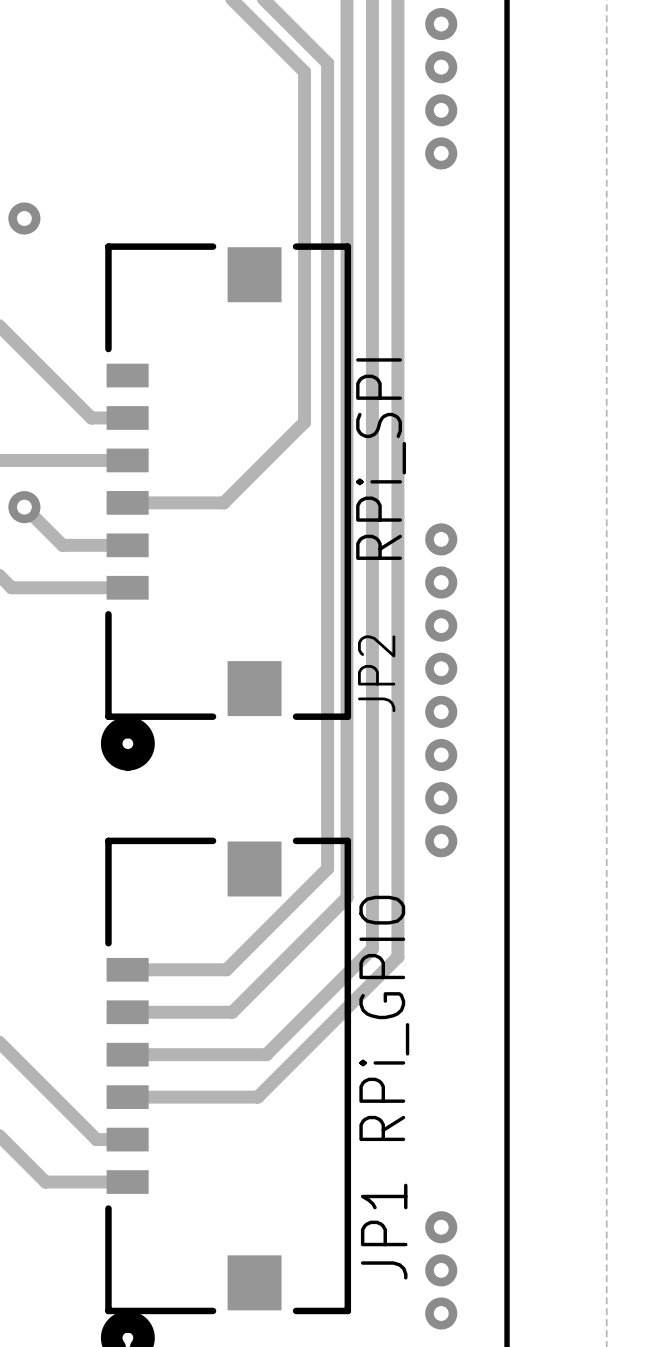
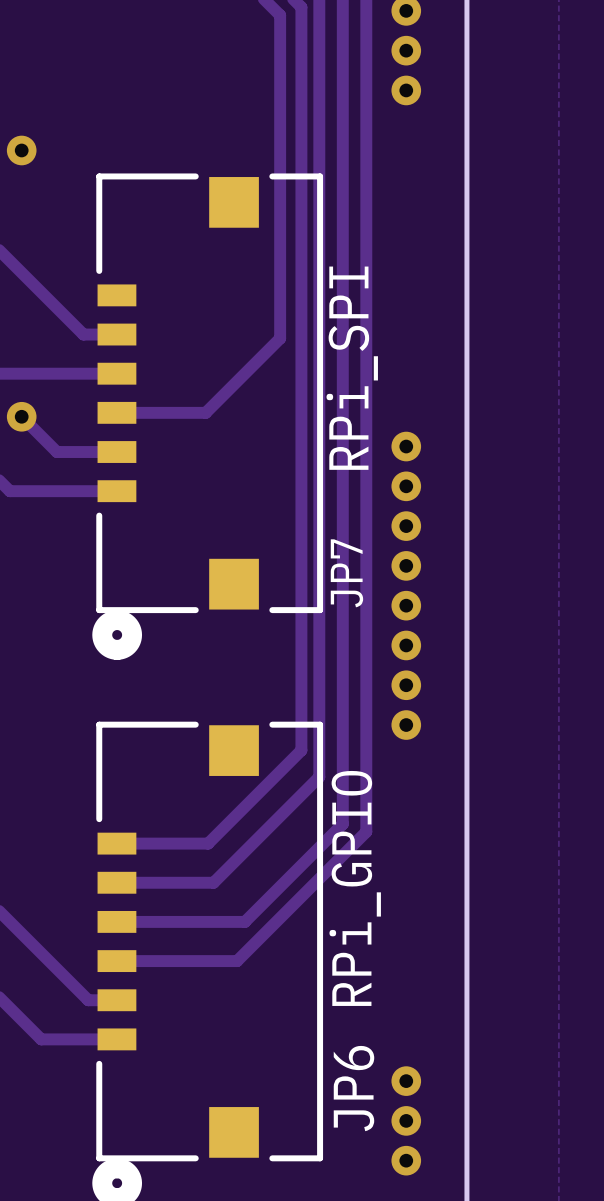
JP2 name: JP2 (376, 673) -> JP7 (346, 573)
JP1 name: JP1 (384, 1231) -> JP6 (353, 1088)

